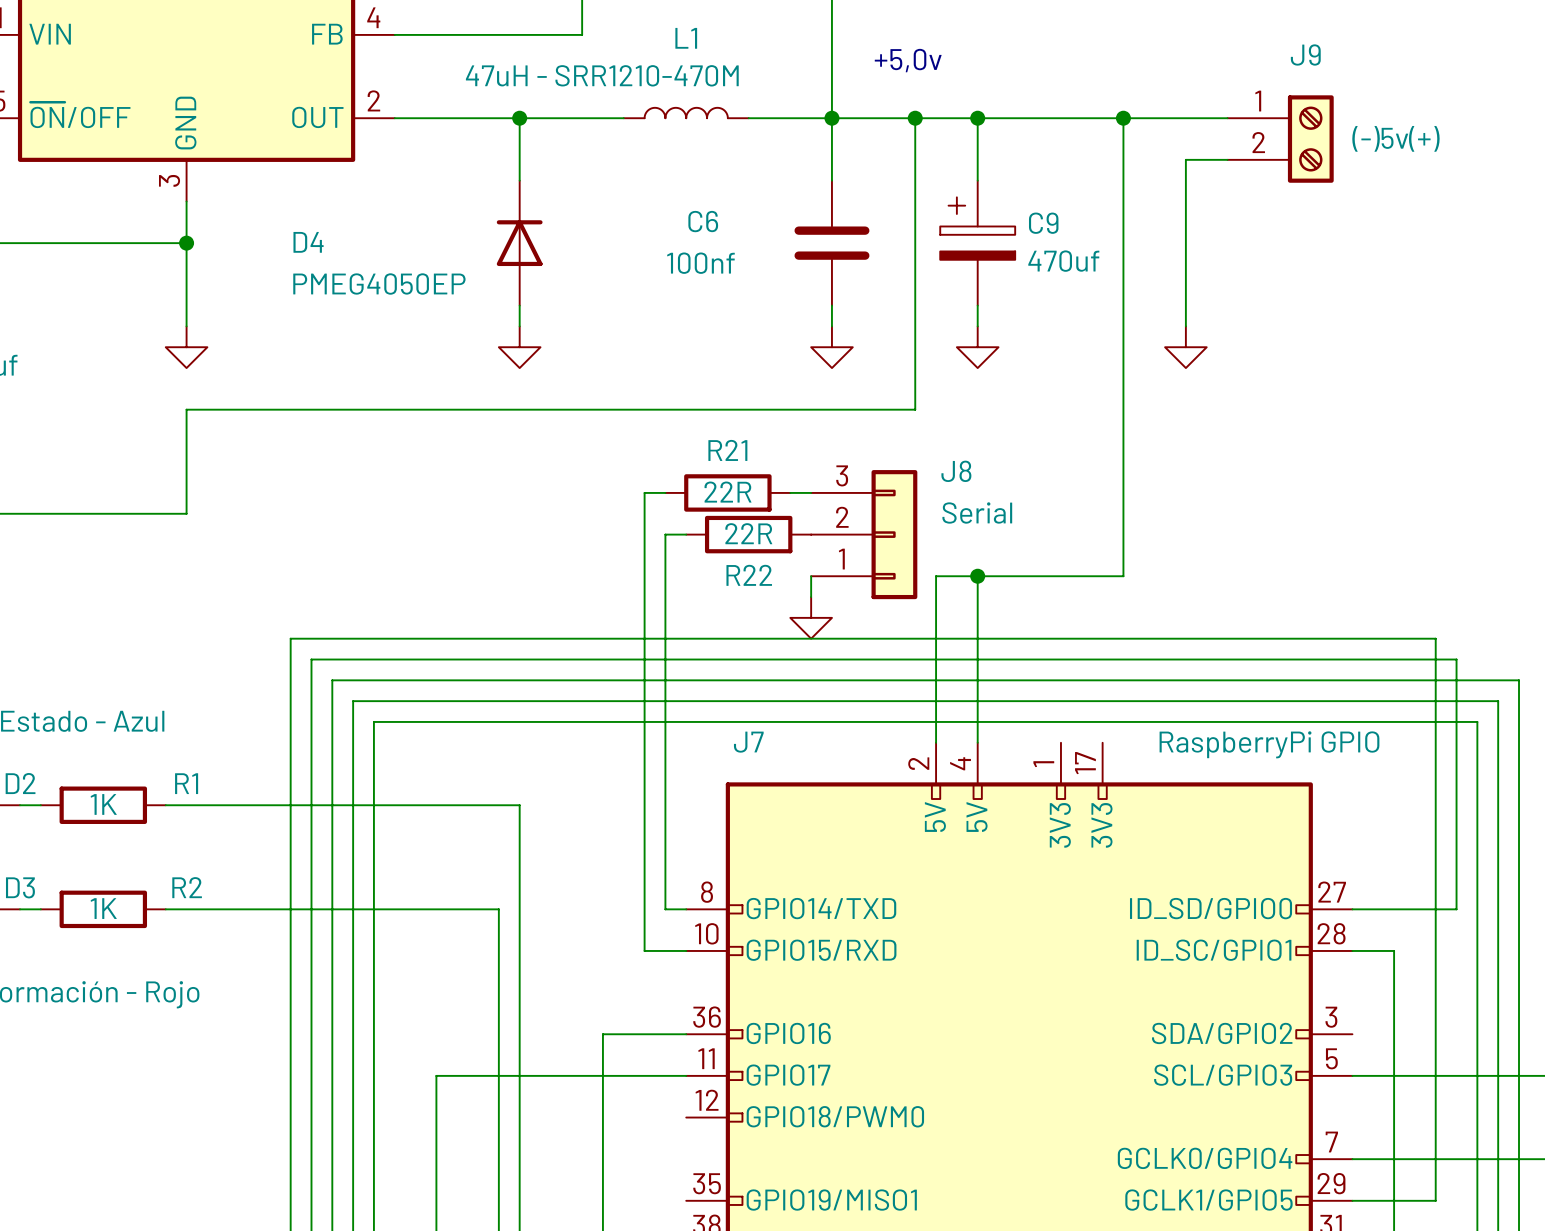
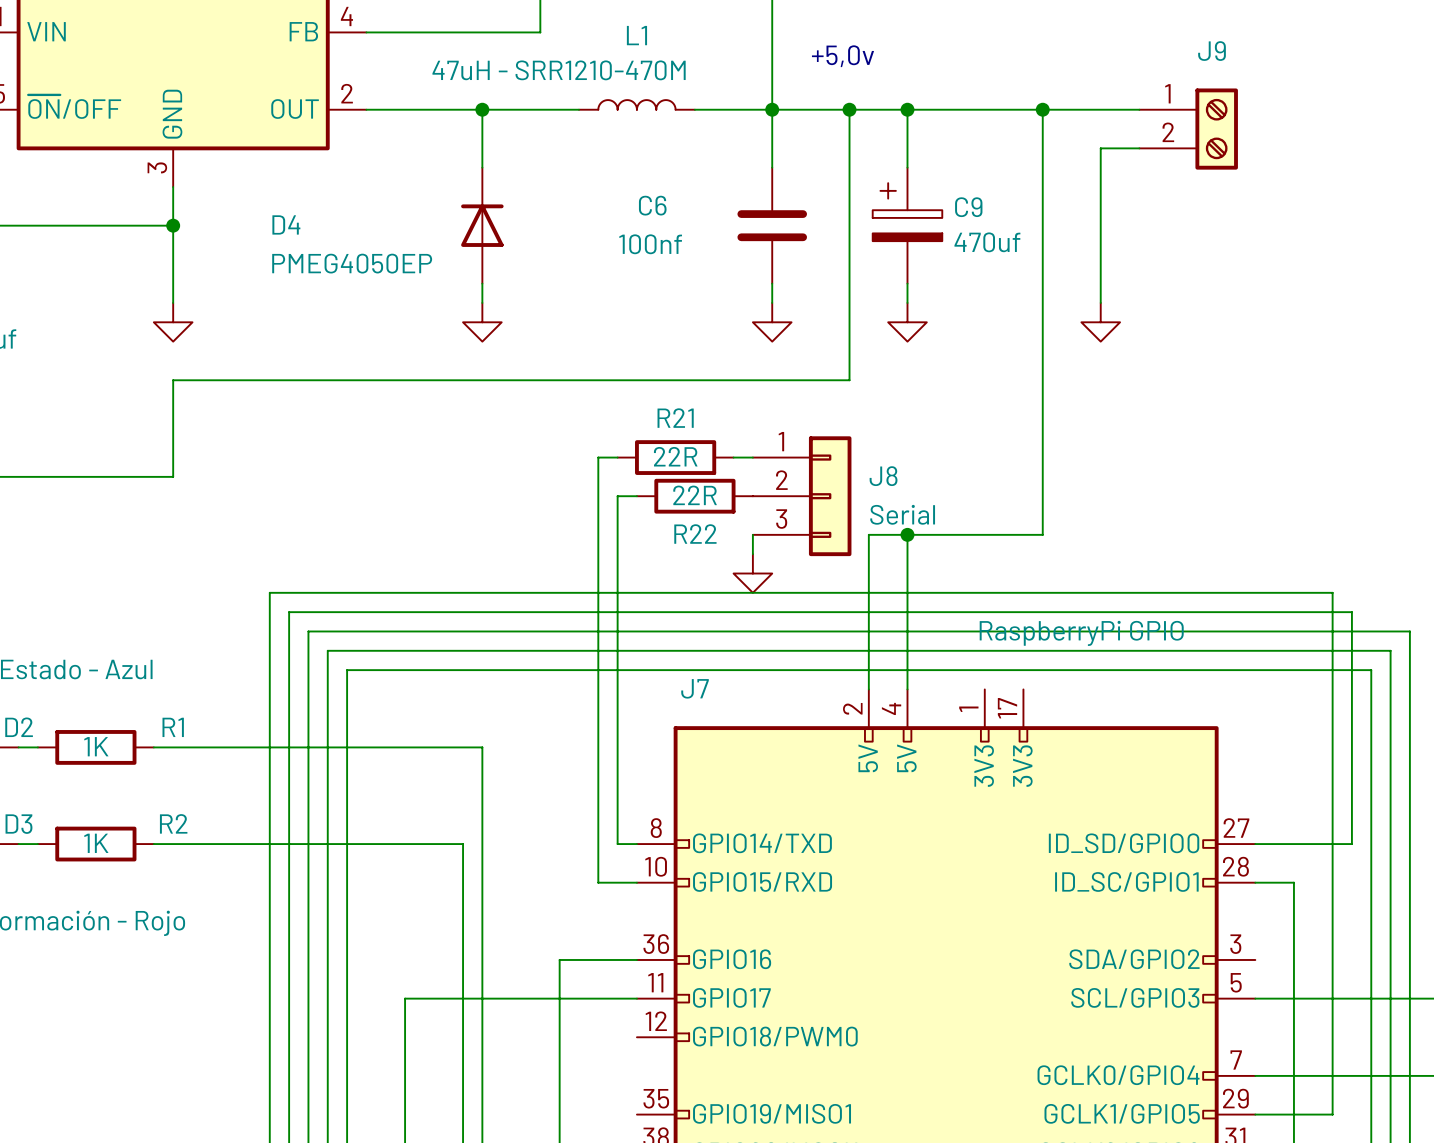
J9 value: (-)5v(+) (1395, 138) -> none
J8 name position: J8 (956, 471) -> J8 (883, 476)
J8 flip: as is (894, 534) -> up-down (830, 496)
J7 value position: RaspberryPi GPIO (1269, 744) -> RaspberryPi GPIO (1081, 633)

